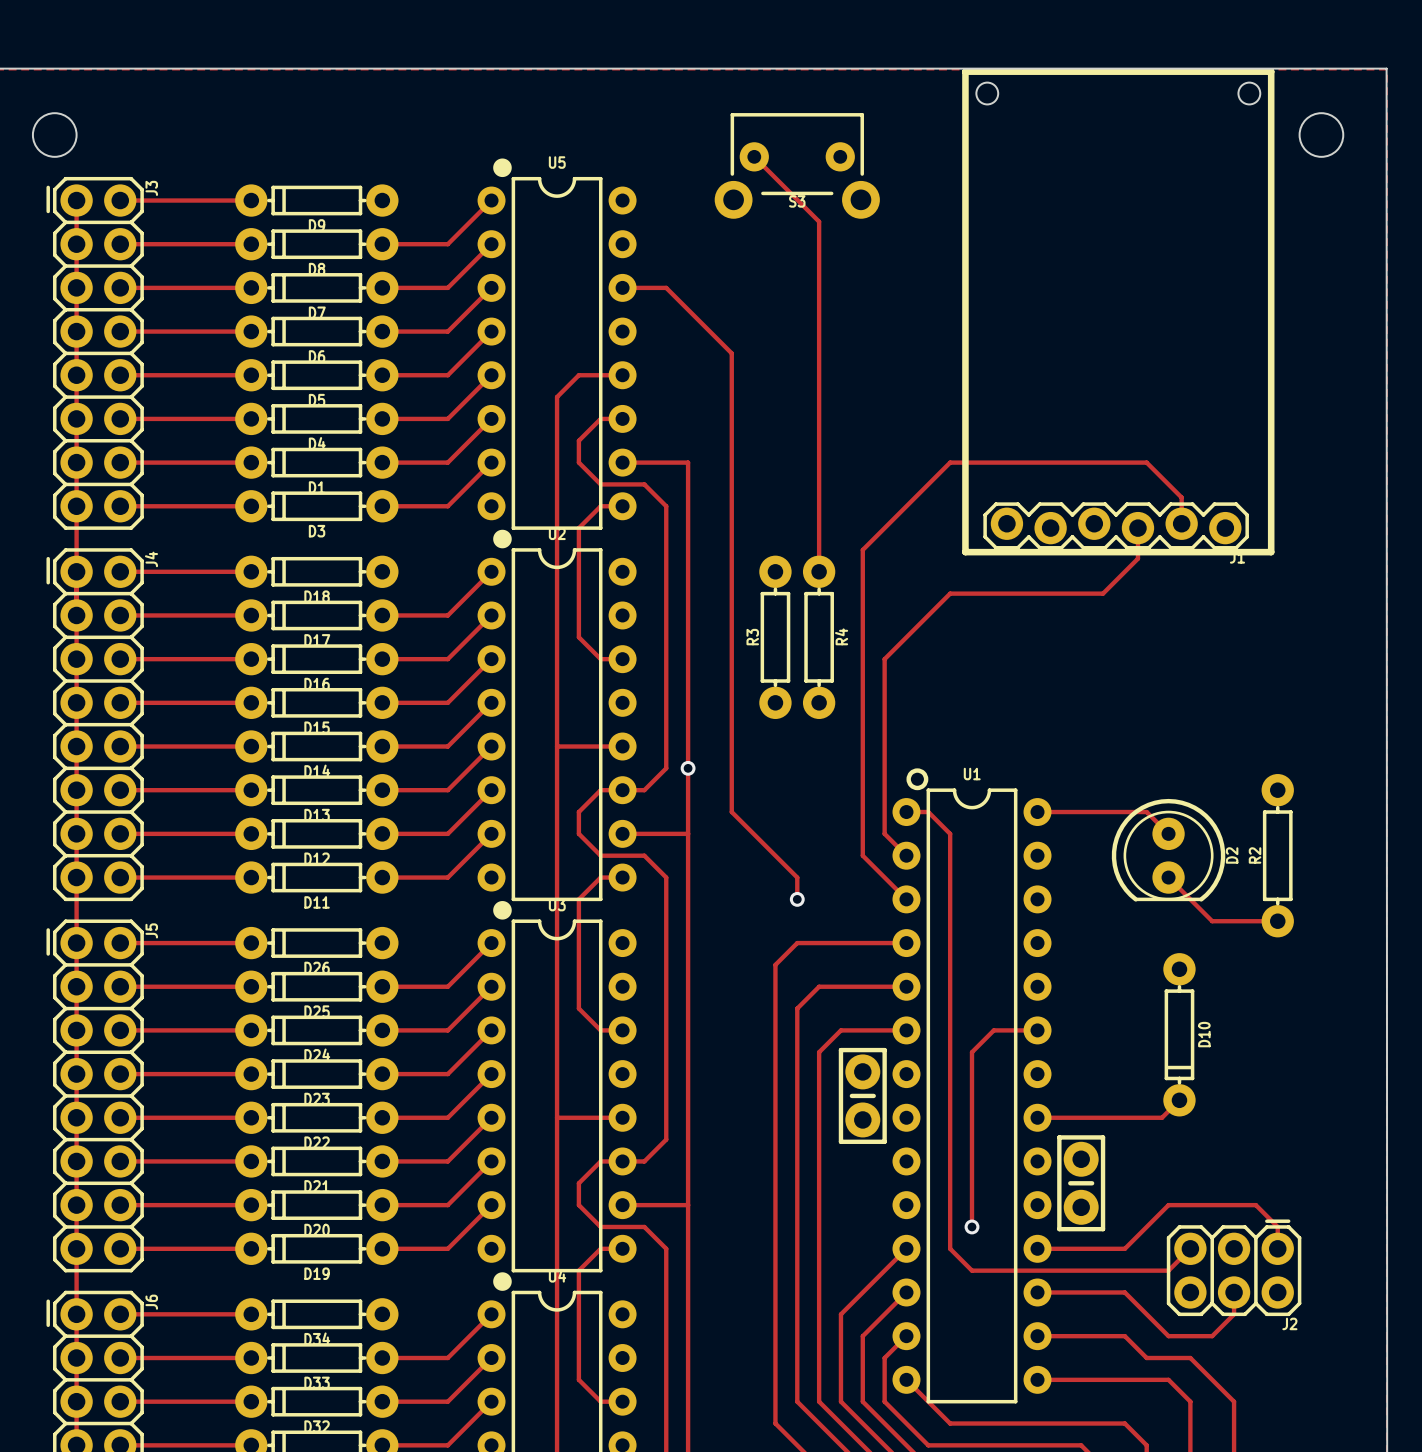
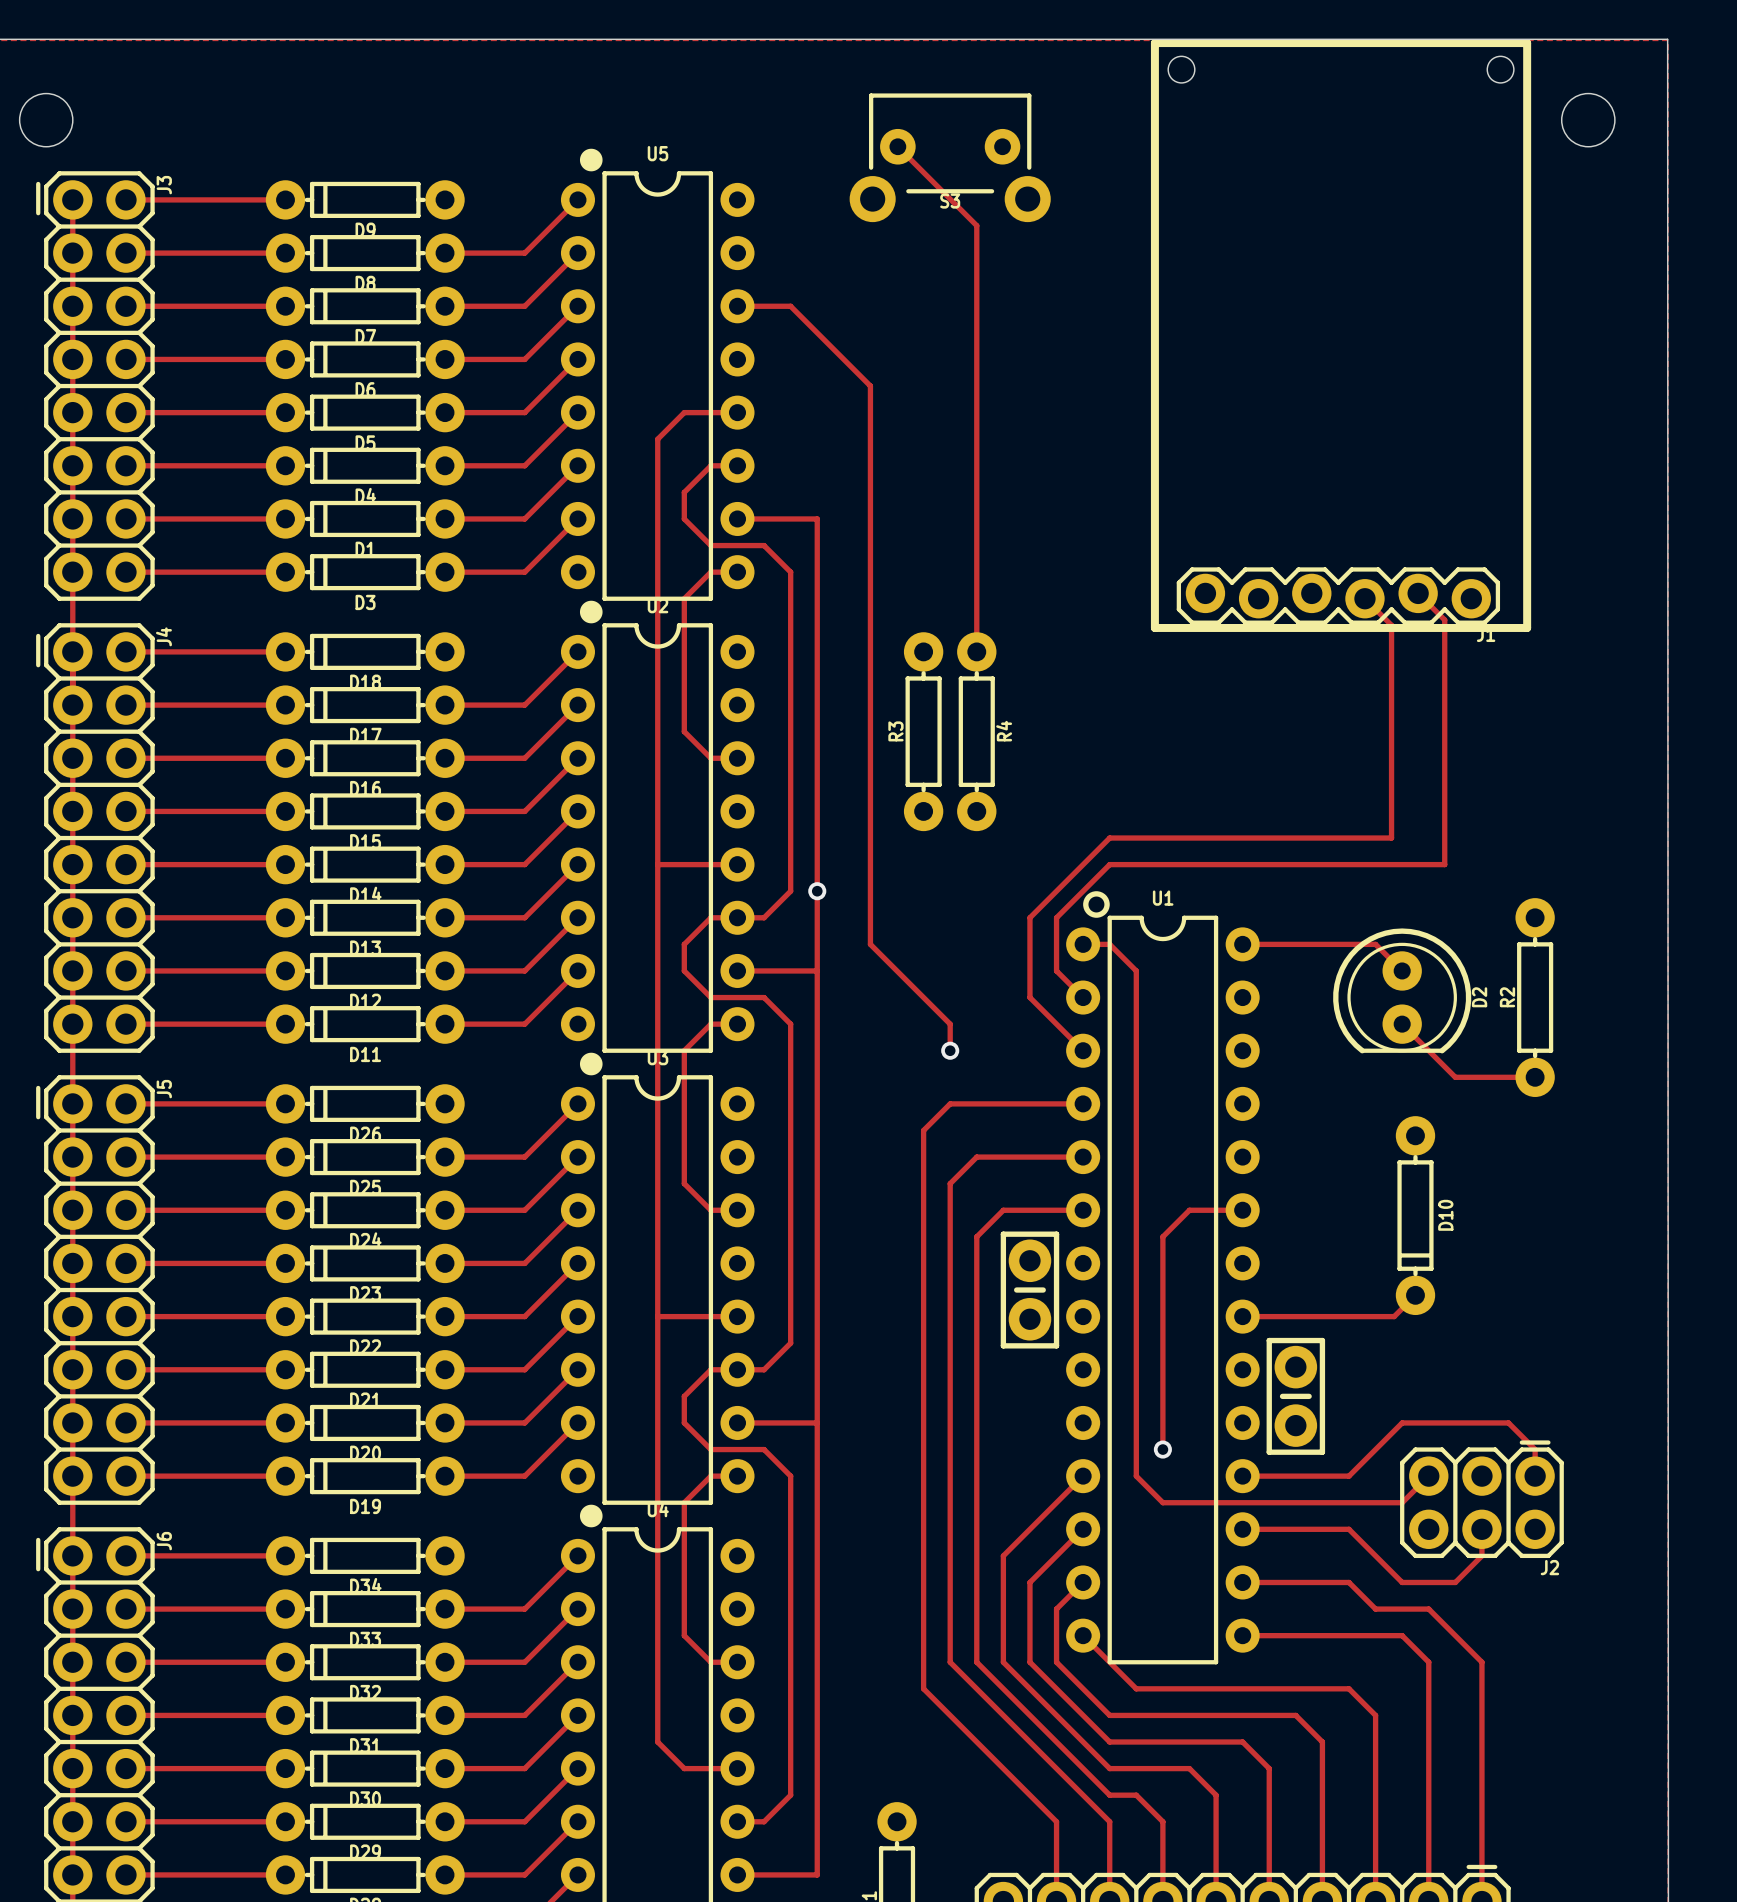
track: (1181, 523) (1181, 497) (1146, 462) (950, 462) (862, 549) (862, 790) -> (1418, 593) (1444, 620) (1444, 864) (1109, 864) (1056, 917)
track: (1137, 528) (1137, 558) (1103, 593) (950, 593) (884, 659) (884, 790) -> (1364, 598) (1391, 625) (1391, 838) (1109, 838) (1029, 917)

